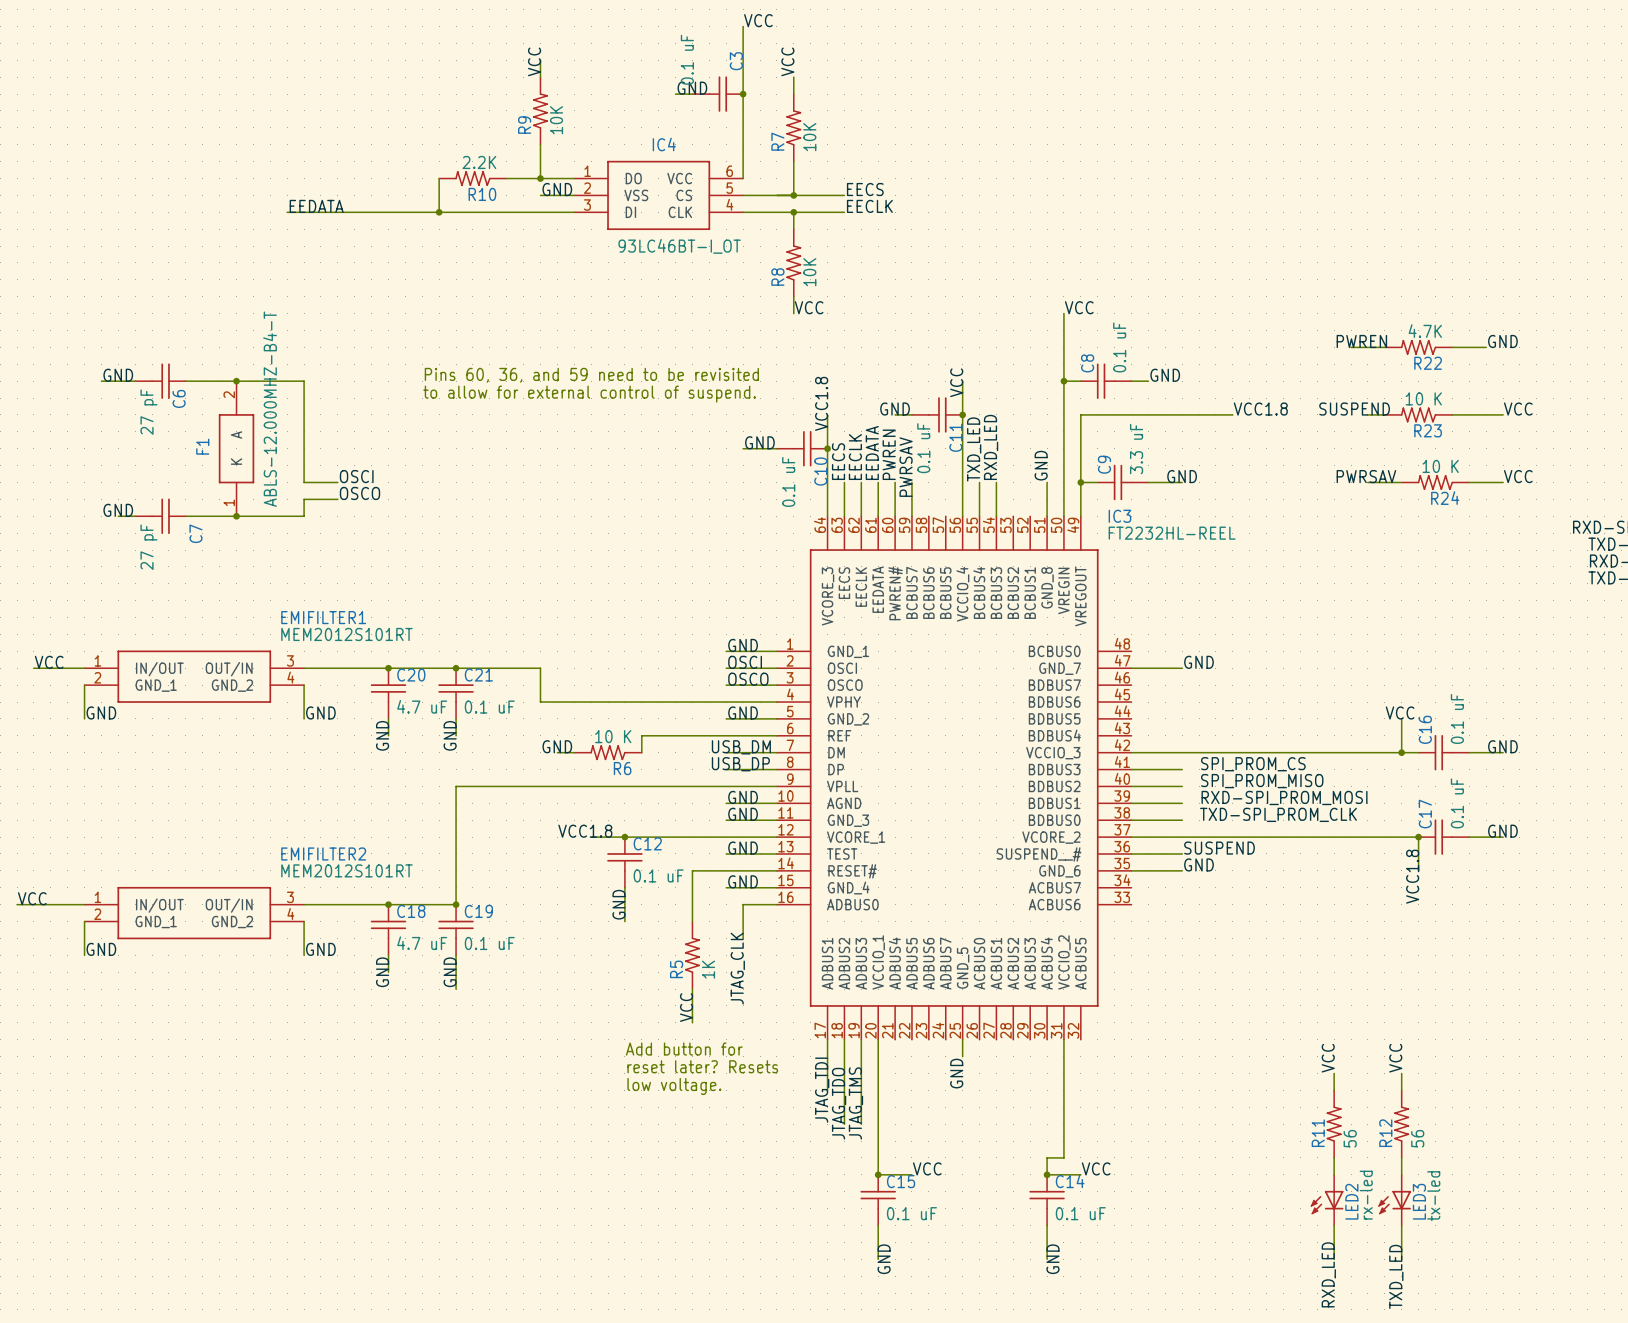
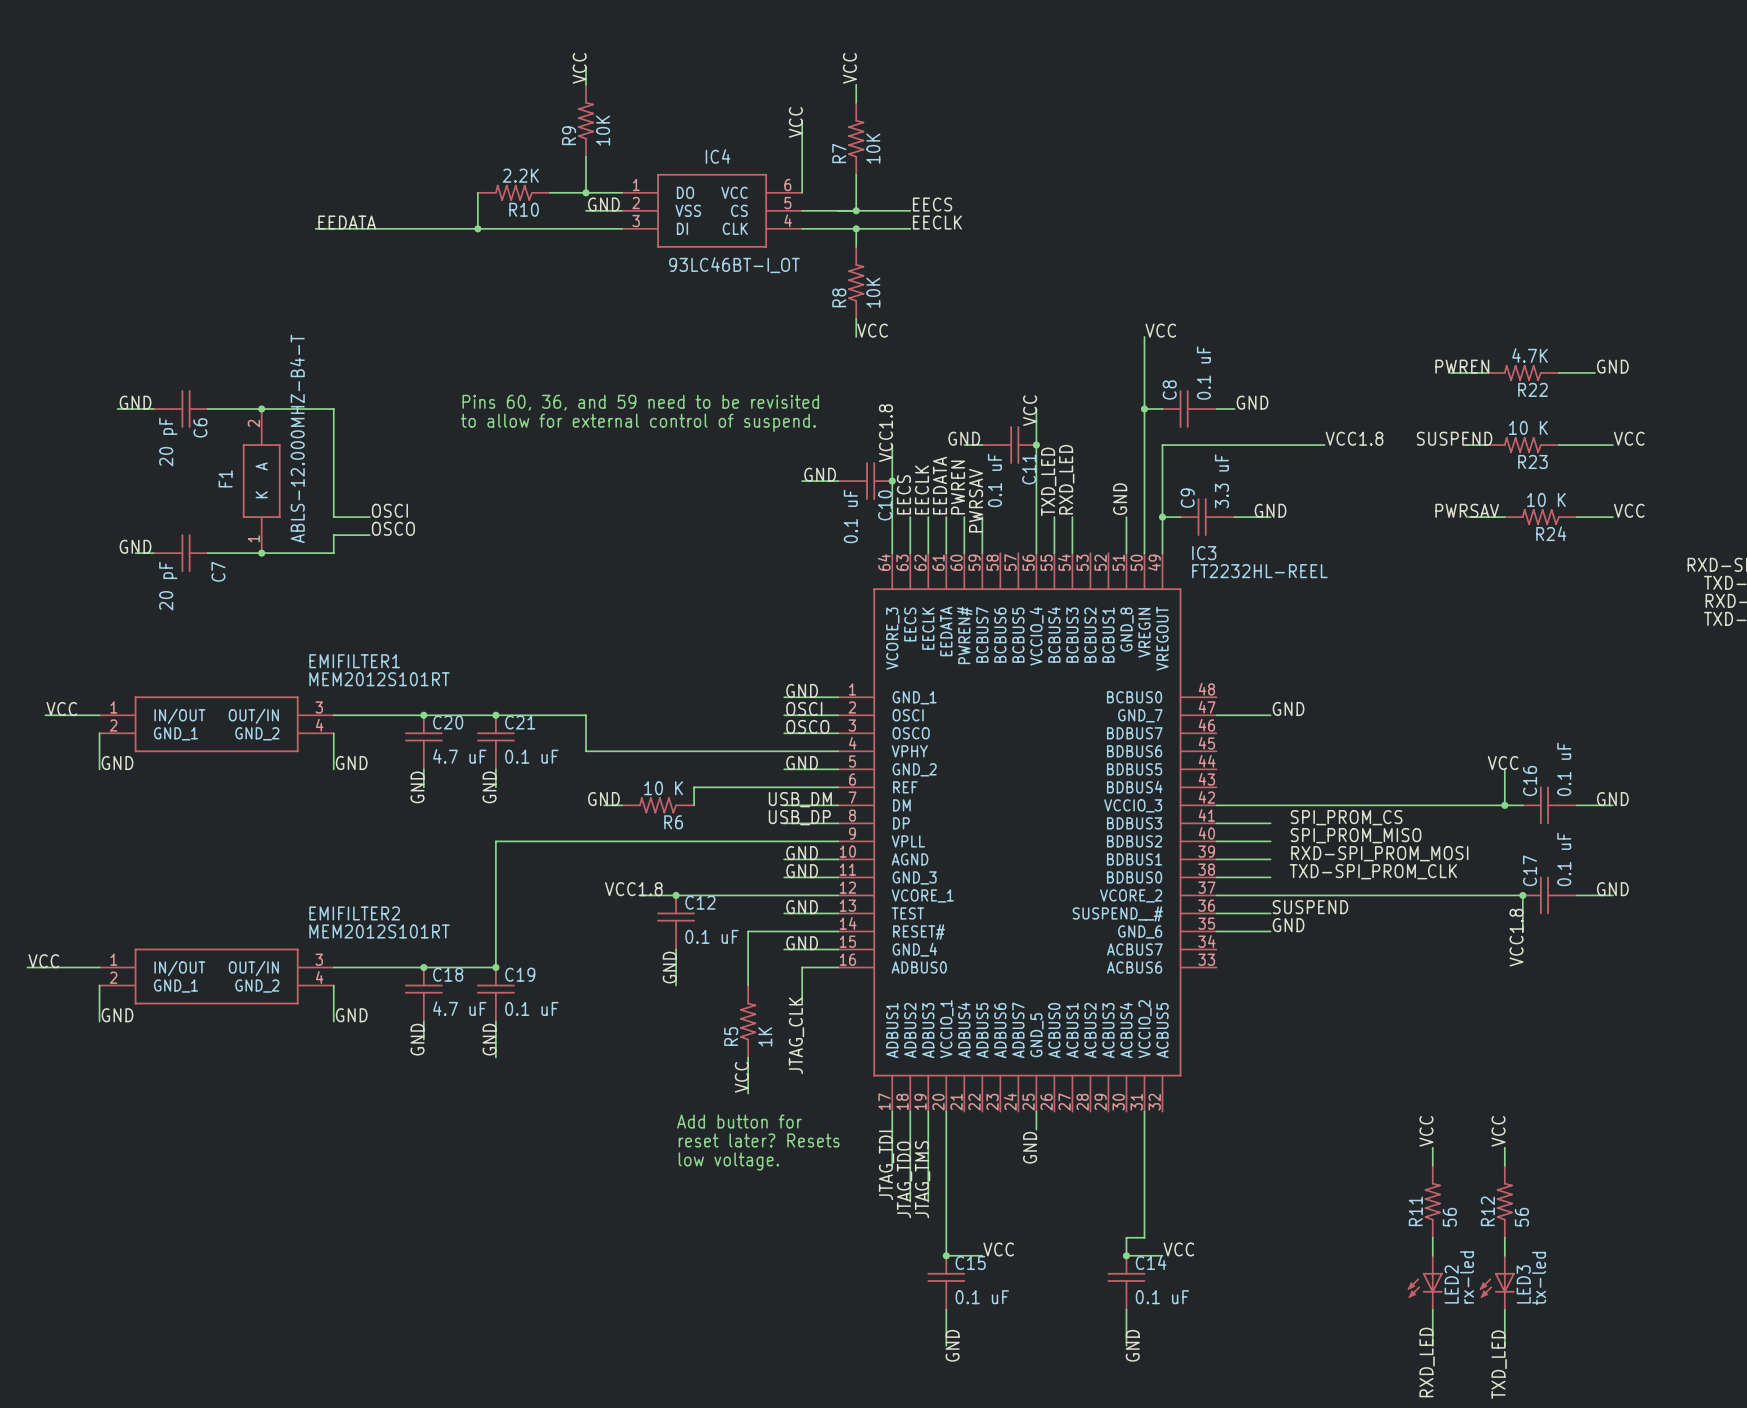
label rotation: 0° (758, 20) -> 90° counterclockwise (795, 122)
label position: VCC (758, 20) -> VCC (795, 122)
wire: (743, 26) (743, 110) -> none
label: GND (692, 88) -> none
wire: (675, 94) (692, 94) -> none
C3: 0.1 uF (717, 94) -> none
junction: (743, 94) -> none
C6 value: 27 pF (148, 412) -> 20 pF (168, 442)
C7 value: 27 pF (148, 547) -> 20 pF (168, 586)

